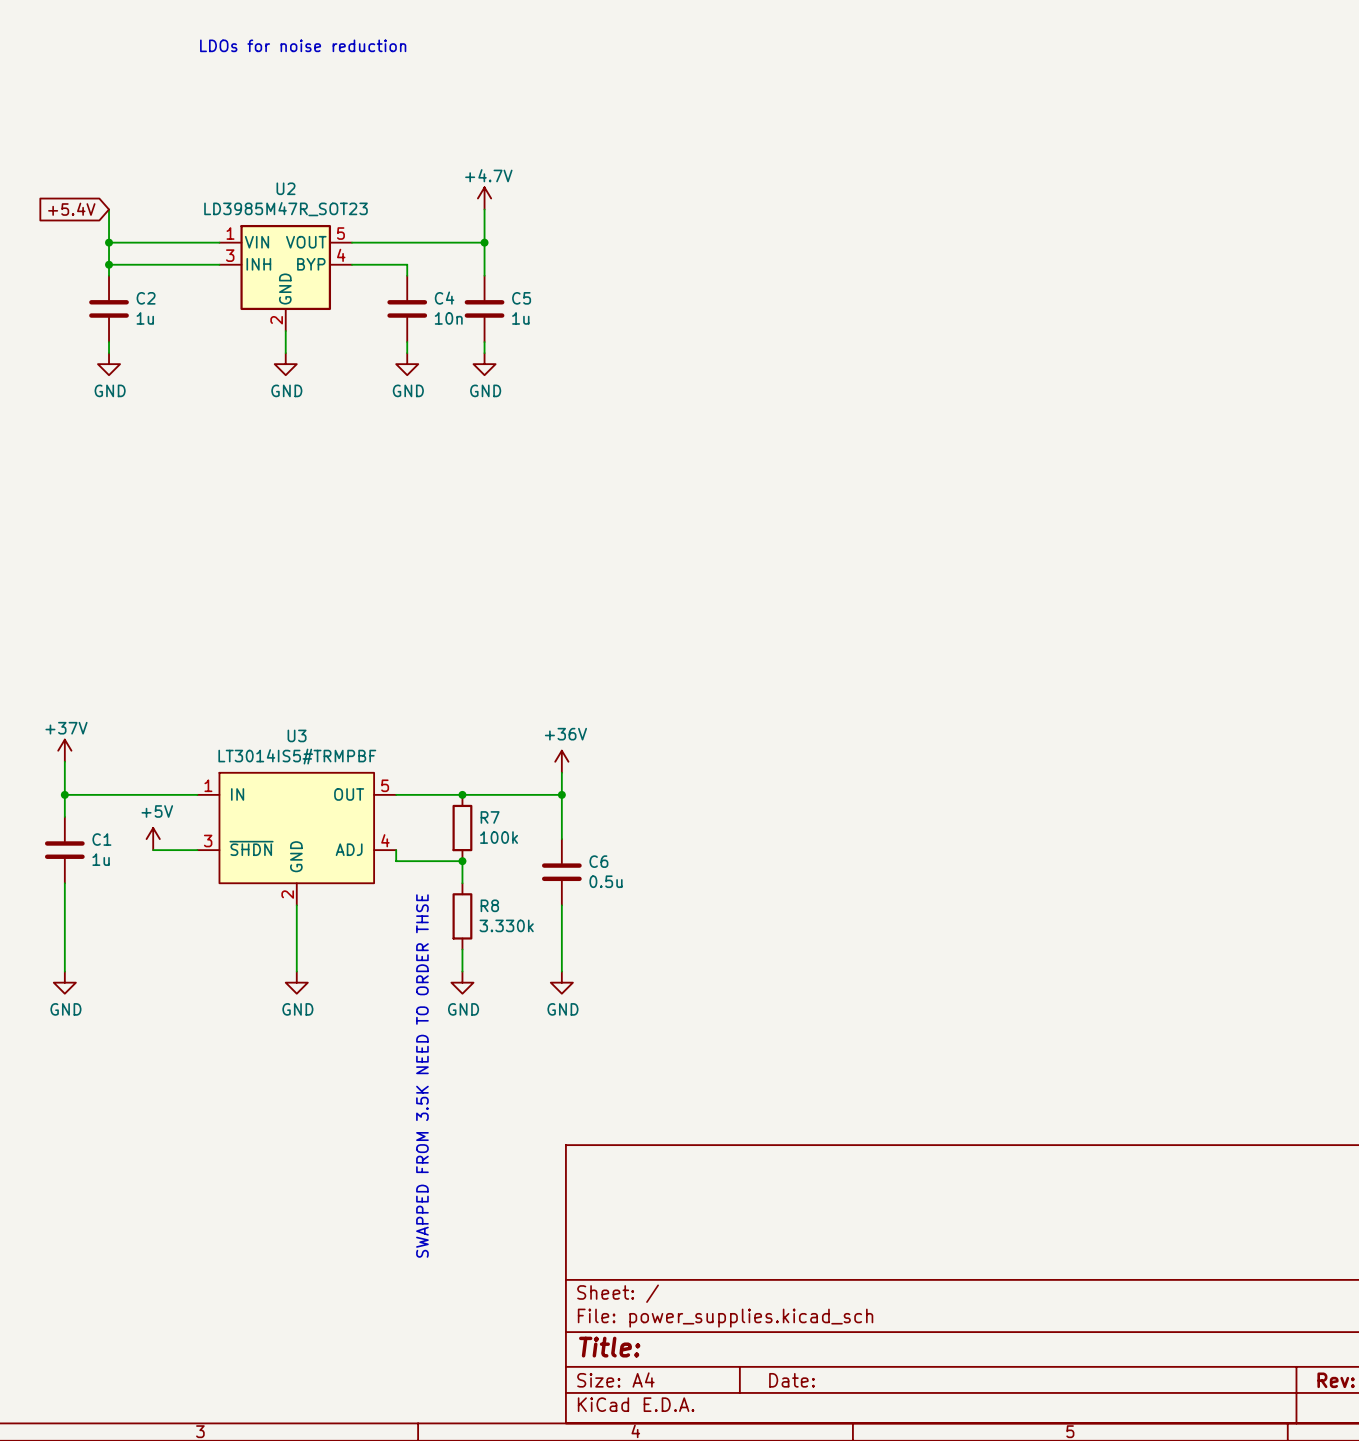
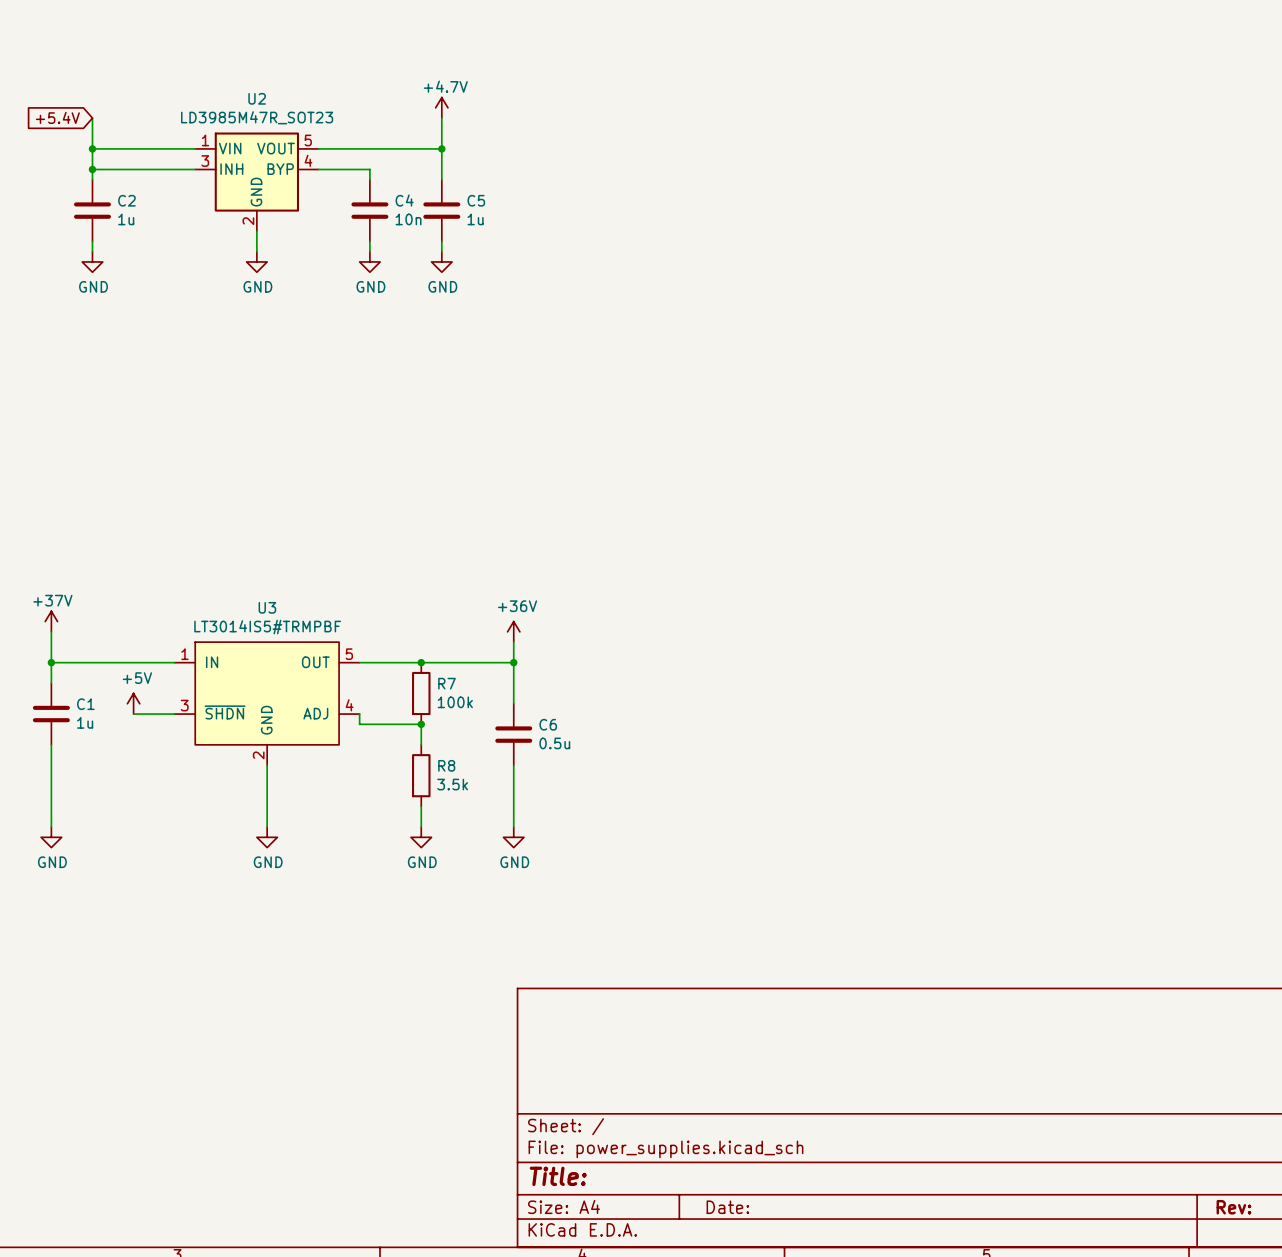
R8 value: 3.330k (506, 925) -> 3.5k (452, 784)
text: SWAPPED FROM 3.5K NEED TO ORDER THSE (422, 1076) -> none

